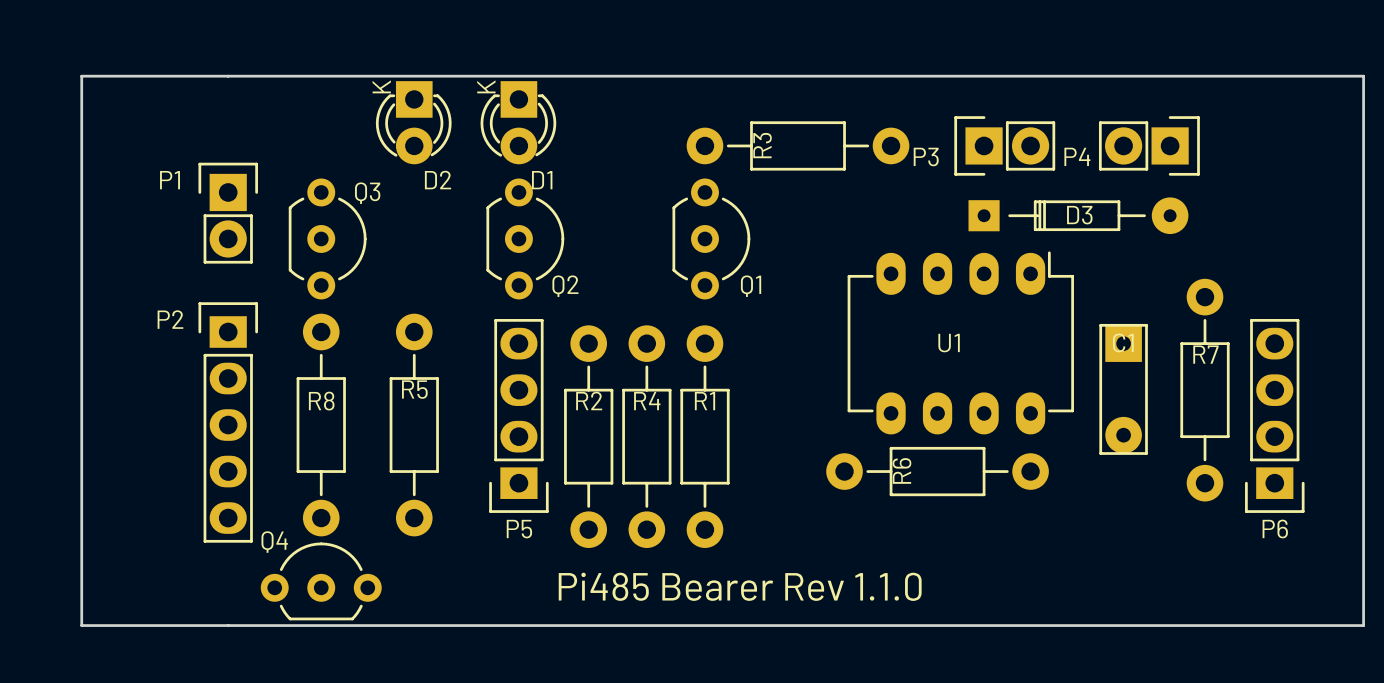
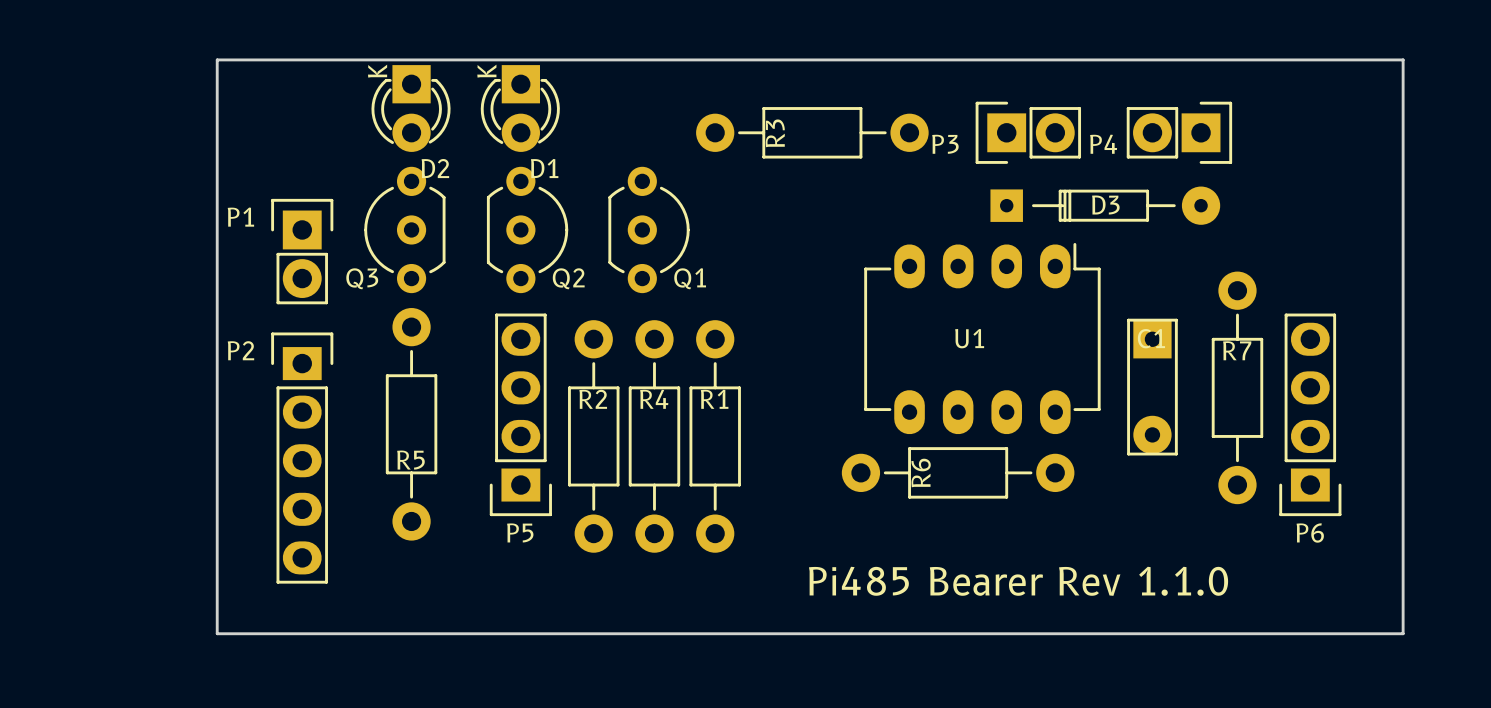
board edge: (228, 76) (81, 76) (81, 625) (228, 625) -> (217, 59) (217, 633)
P1 position: (228, 213) -> (302, 251)
Q3 rotation: 0° (327, 238) -> 180° (404, 229)
Q3 position: (327, 238) -> (404, 229)
Q1 position: (711, 238) -> (649, 229)
R5 name position: R5 (414, 389) -> R5 (410, 460)
P2 position: (228, 422) -> (302, 458)
R8: (321, 425) -> none
Q4: (321, 581) -> none
text position: Pi485 Bearer Rev 1.1.0 (740, 586) -> Pi485 Bearer Rev 1.1.0 (1018, 581)

